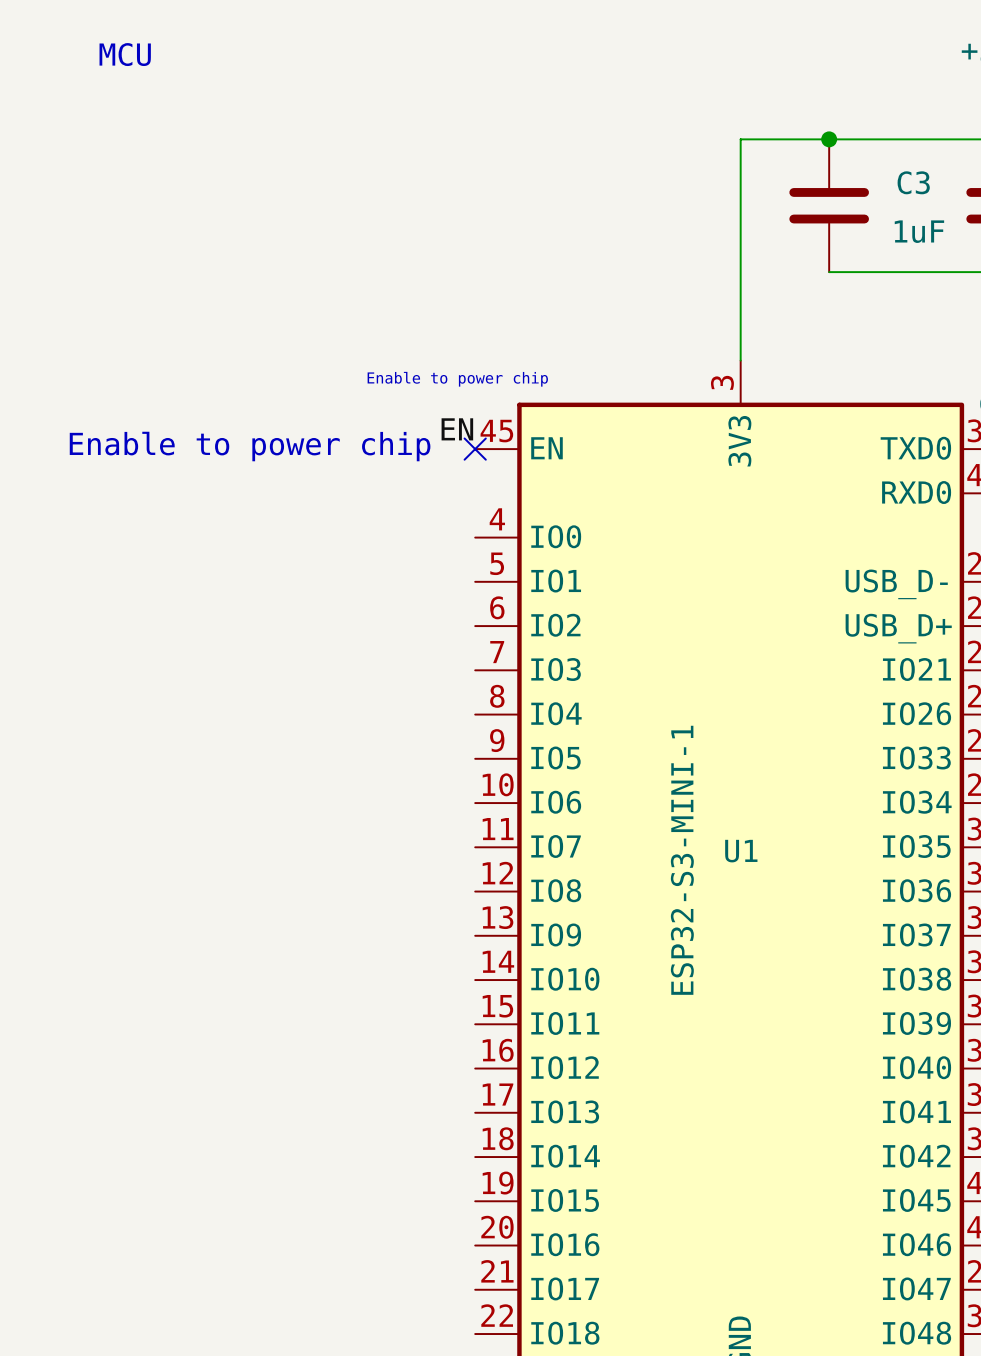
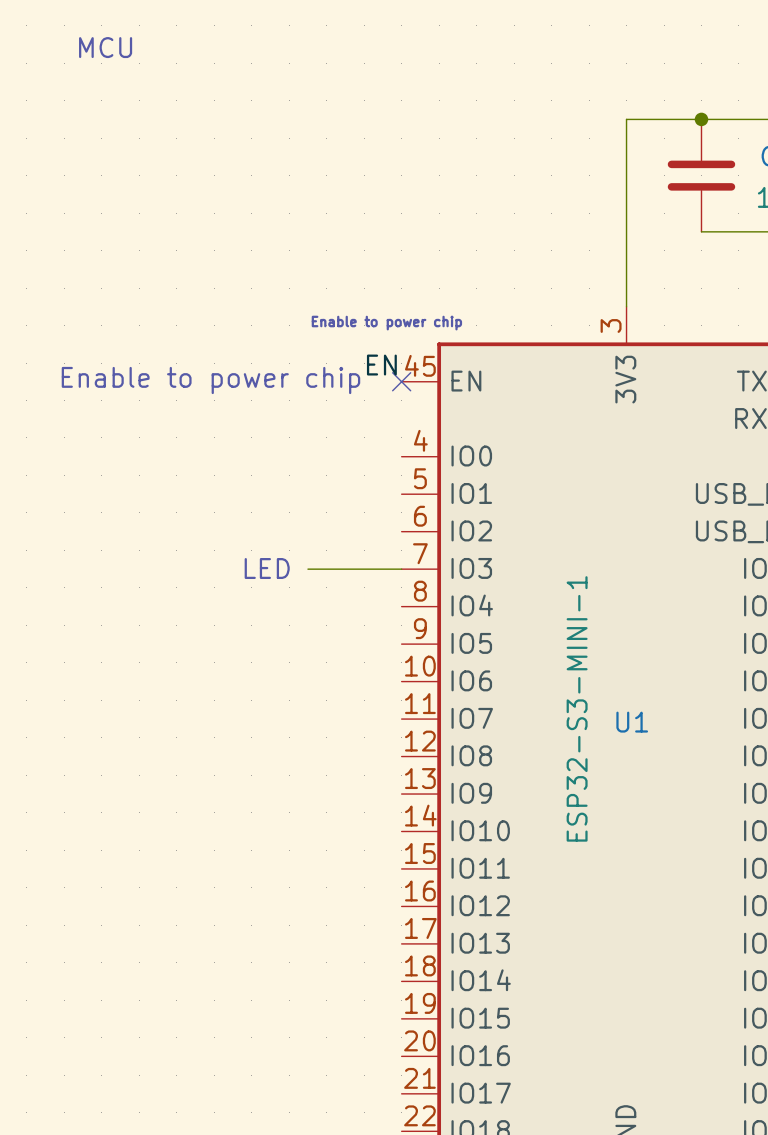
text: none -> LED (267, 568)
wire: none -> (307, 569) (401, 569)

